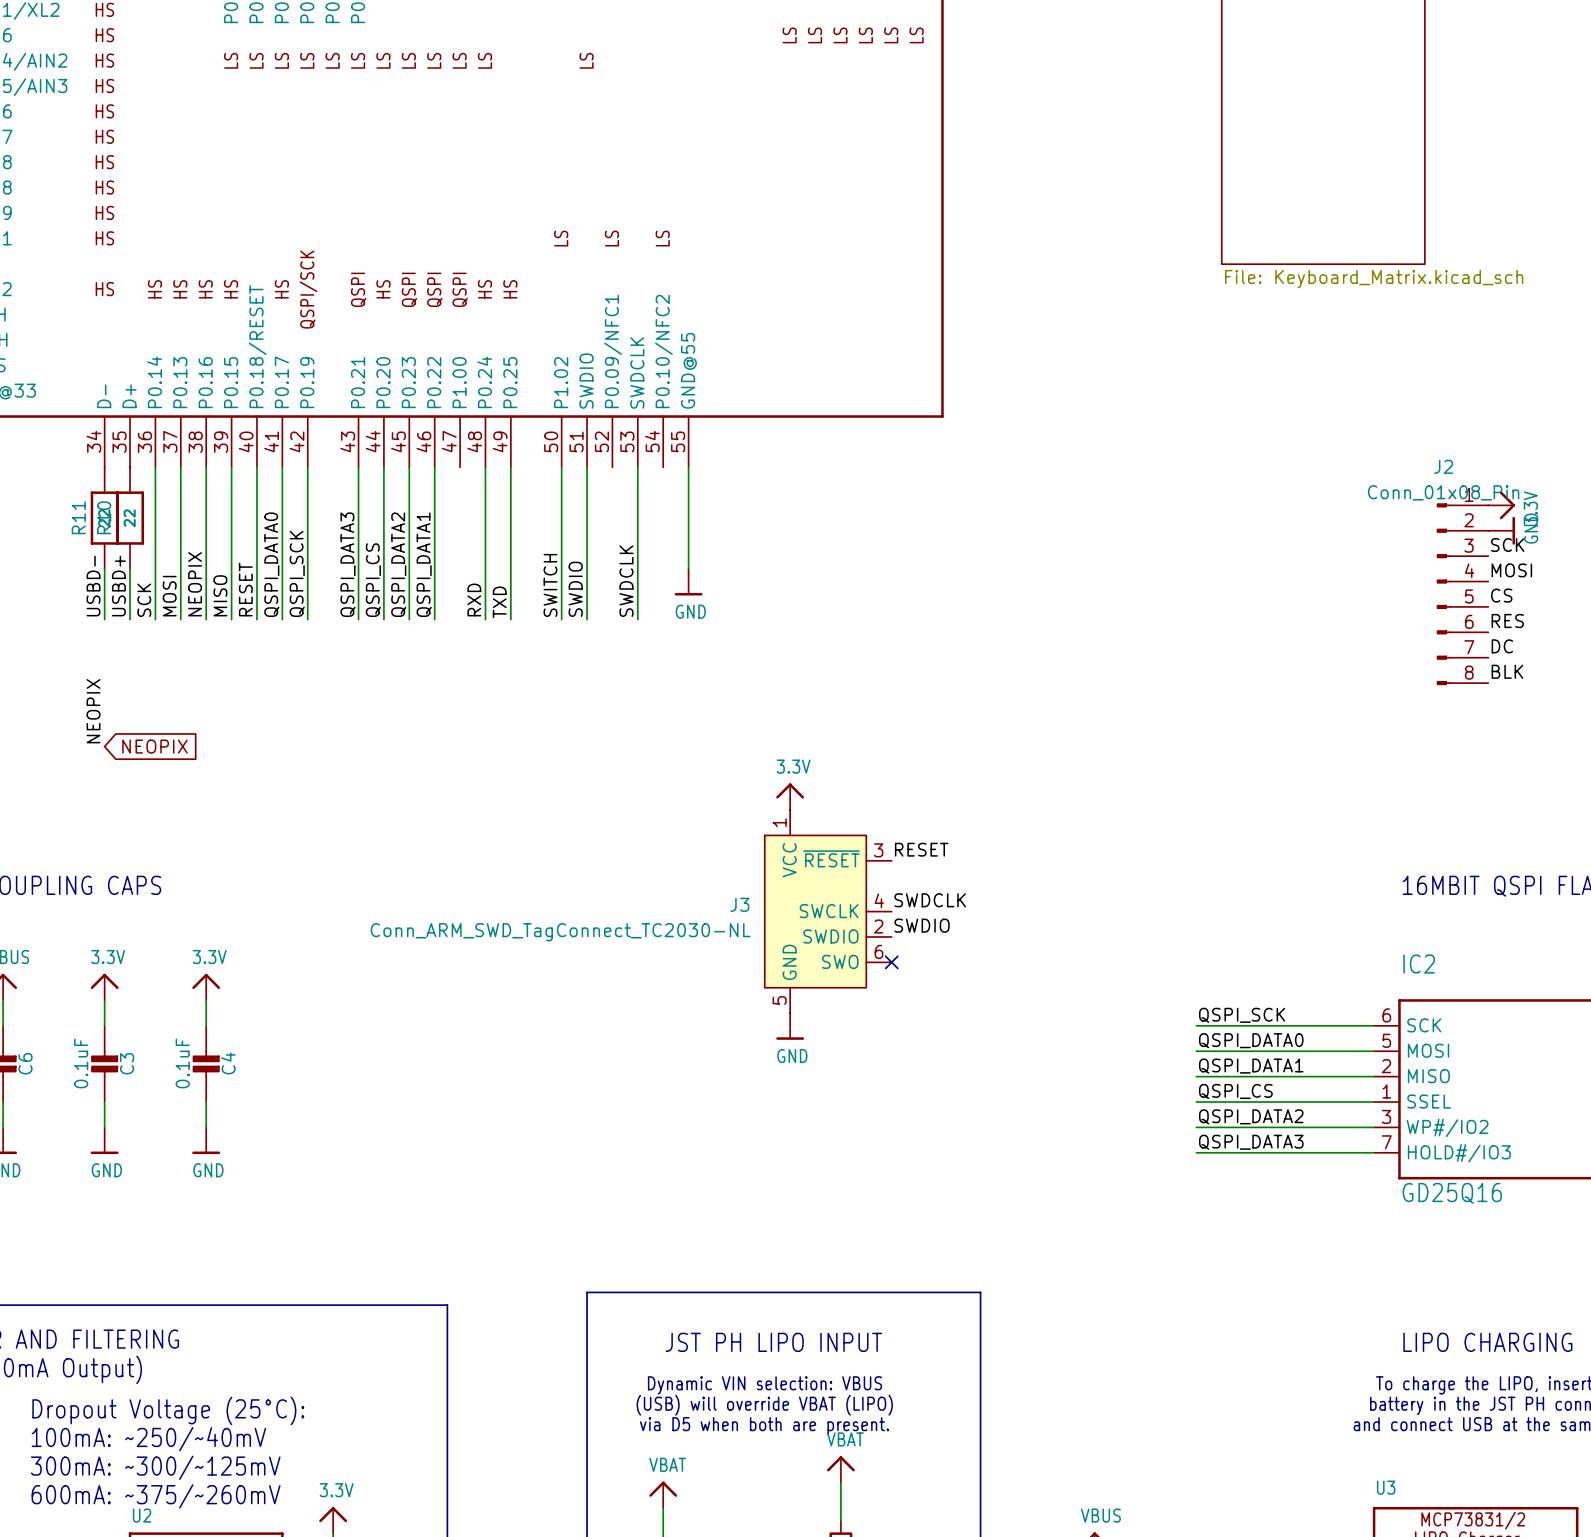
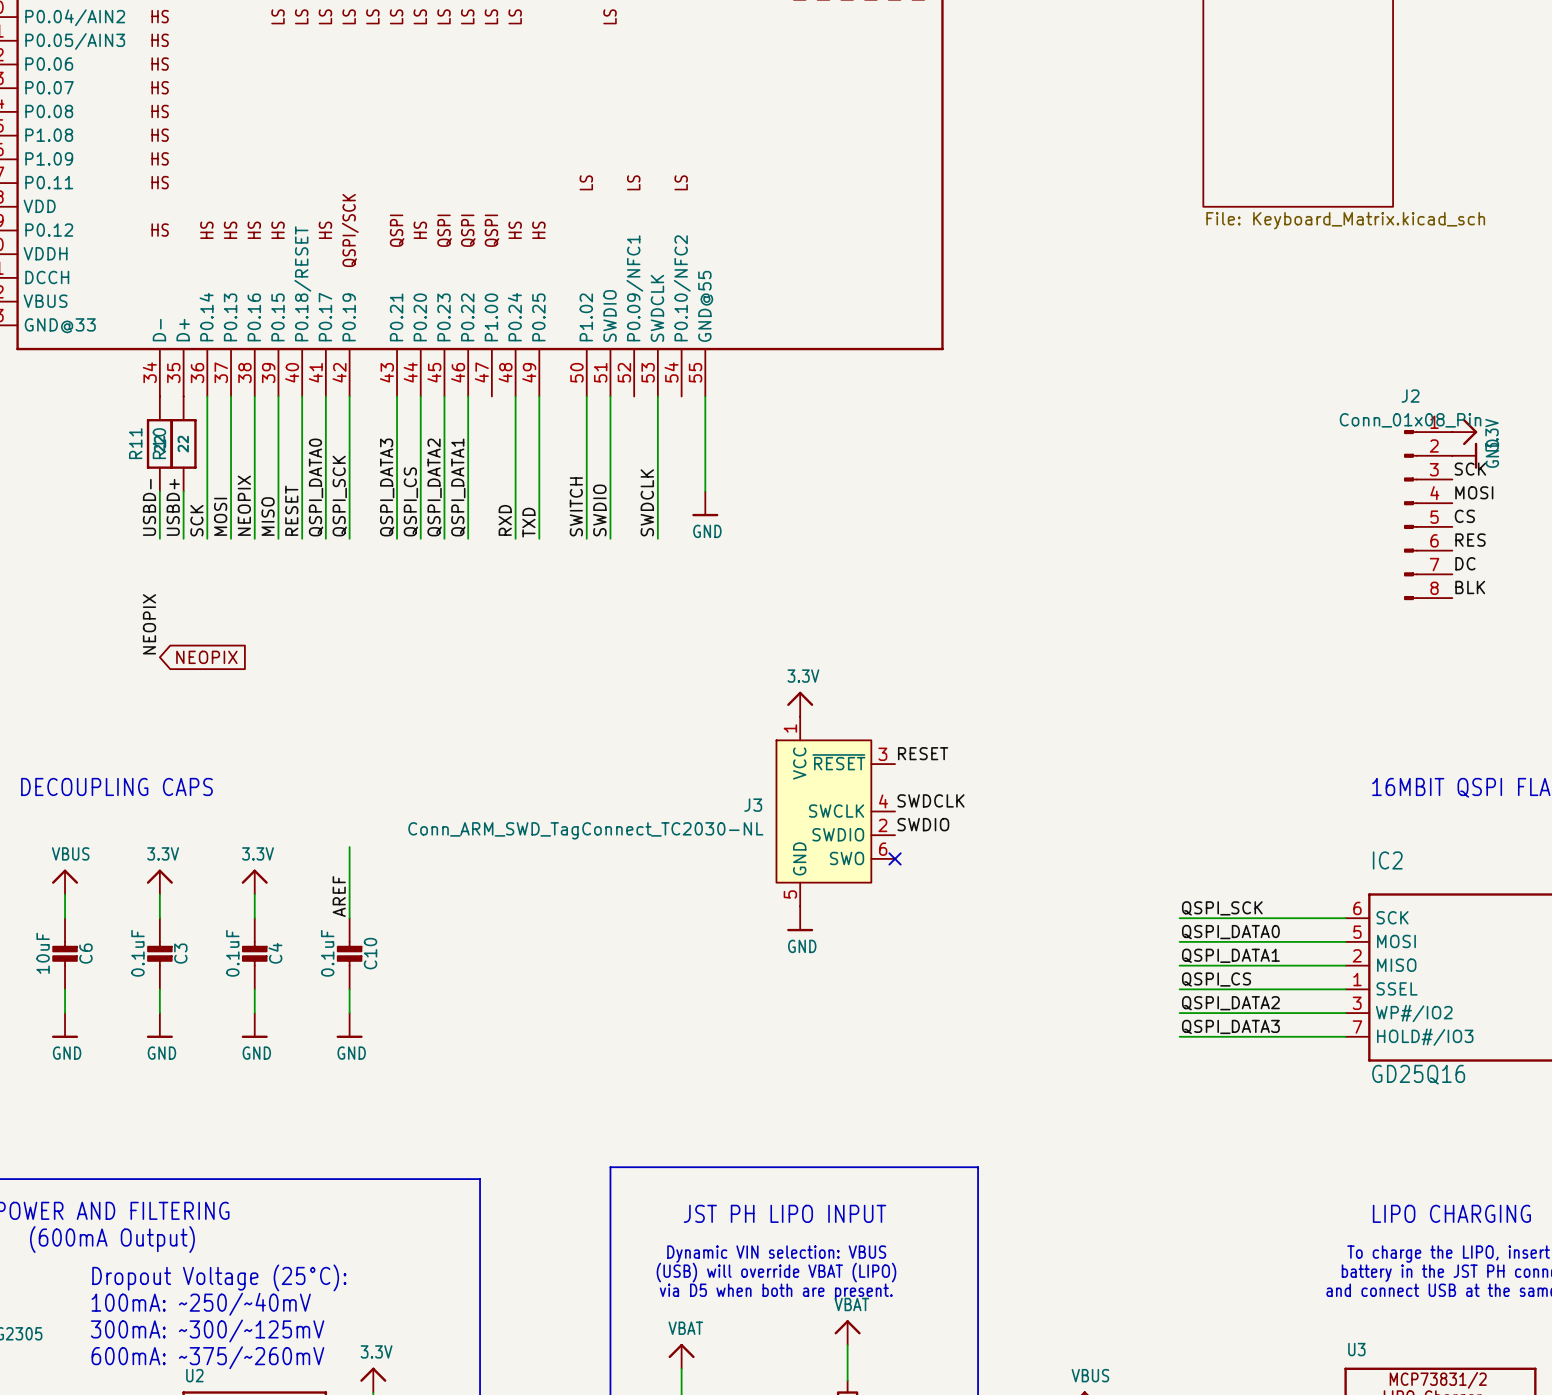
wire: none -> (349, 847) (349, 918)
label: none -> AREF (339, 896)
C10: none -> 0.1uF (349, 953)
wire: none -> (349, 989) (349, 1013)
power symbol: none -> GND (349, 1025)

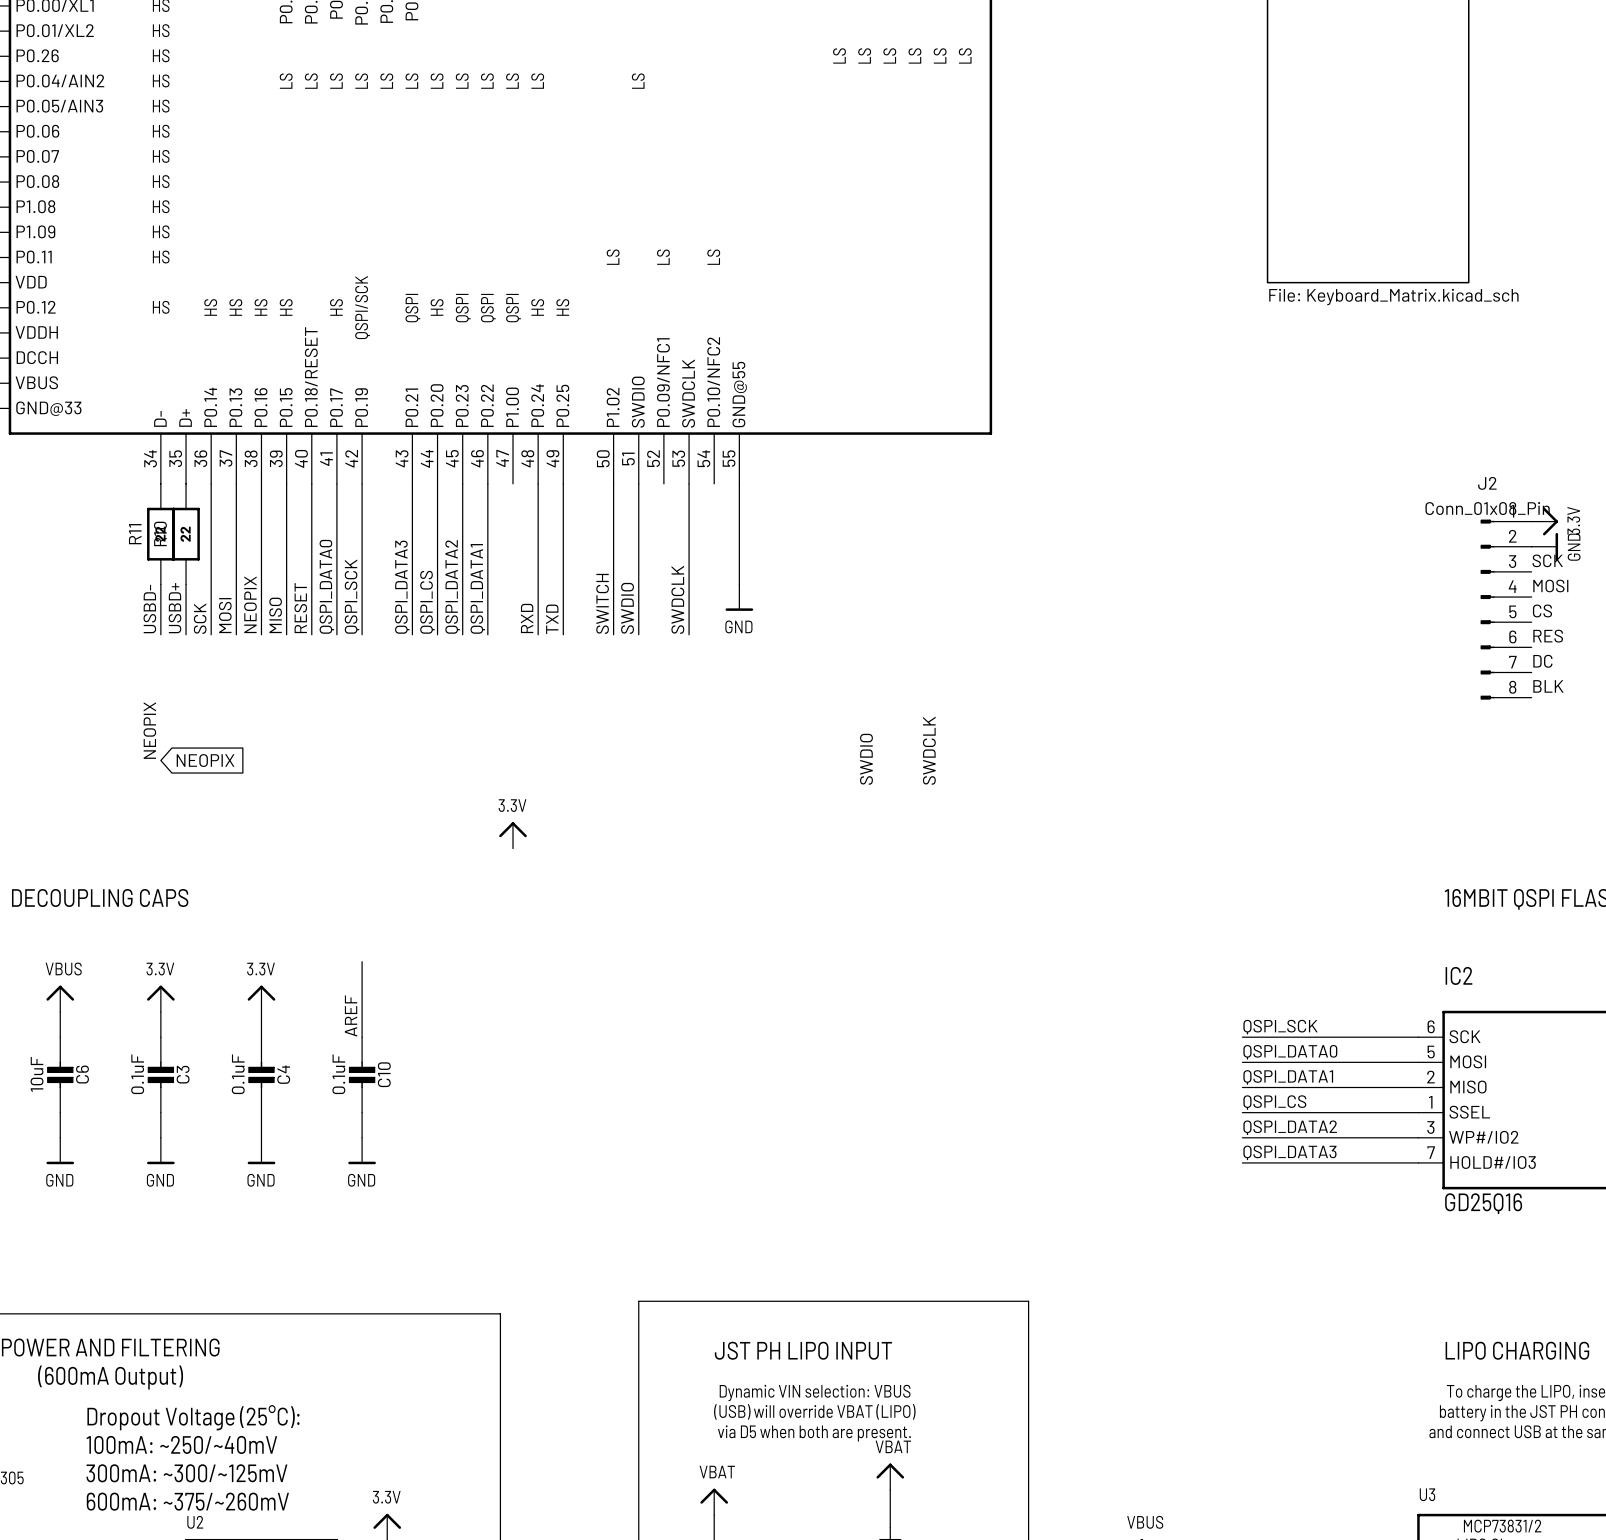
power symbol: 3.3V (800, 704) -> none
power symbol: none -> 3.3V (512, 835)
label: RESET (923, 753) -> none
label rotation: 0° (930, 800) -> 90° counterclockwise (929, 750)
label position: SWDCLK (930, 800) -> SWDCLK (929, 750)
J3: Conn_ARM_SWD_TagConnect_TC2030-NL (835, 811) -> none
label rotation: 0° (923, 824) -> 90° counterclockwise (866, 759)
label position: SWDIO (923, 824) -> SWDIO (866, 759)
no-connect mark: (895, 858) -> none
power symbol: GND (800, 918) -> none

